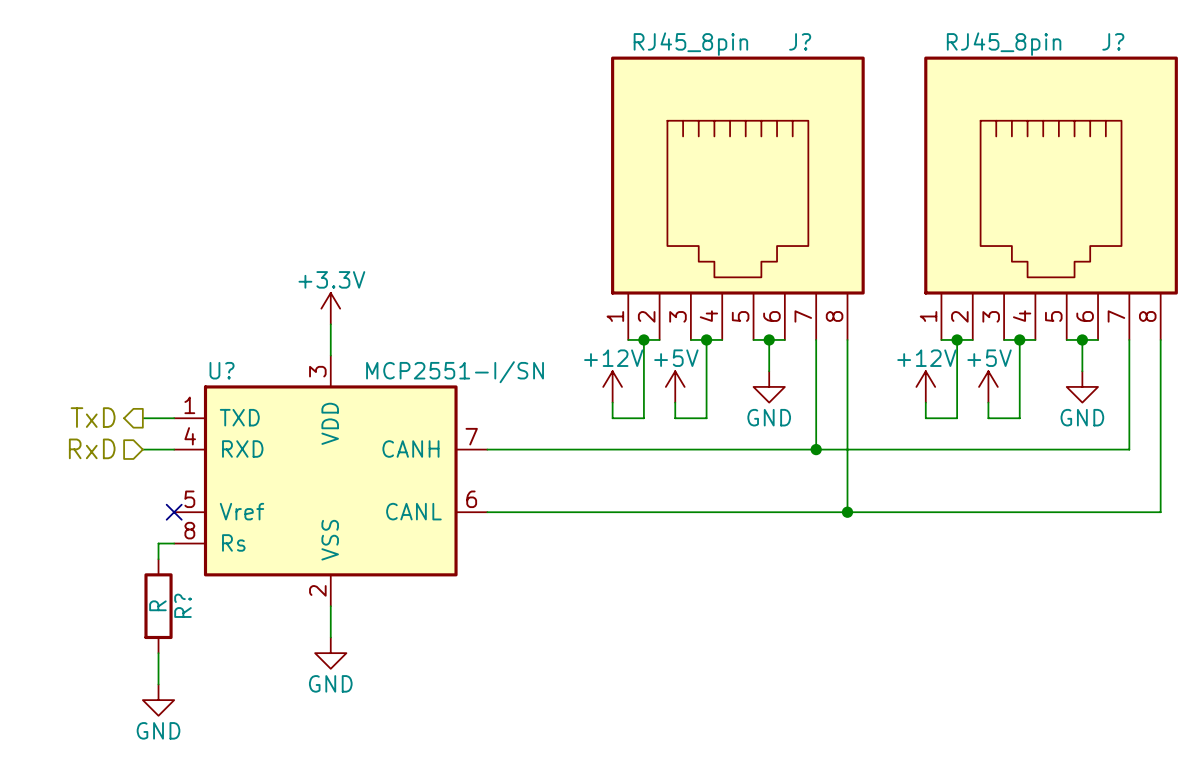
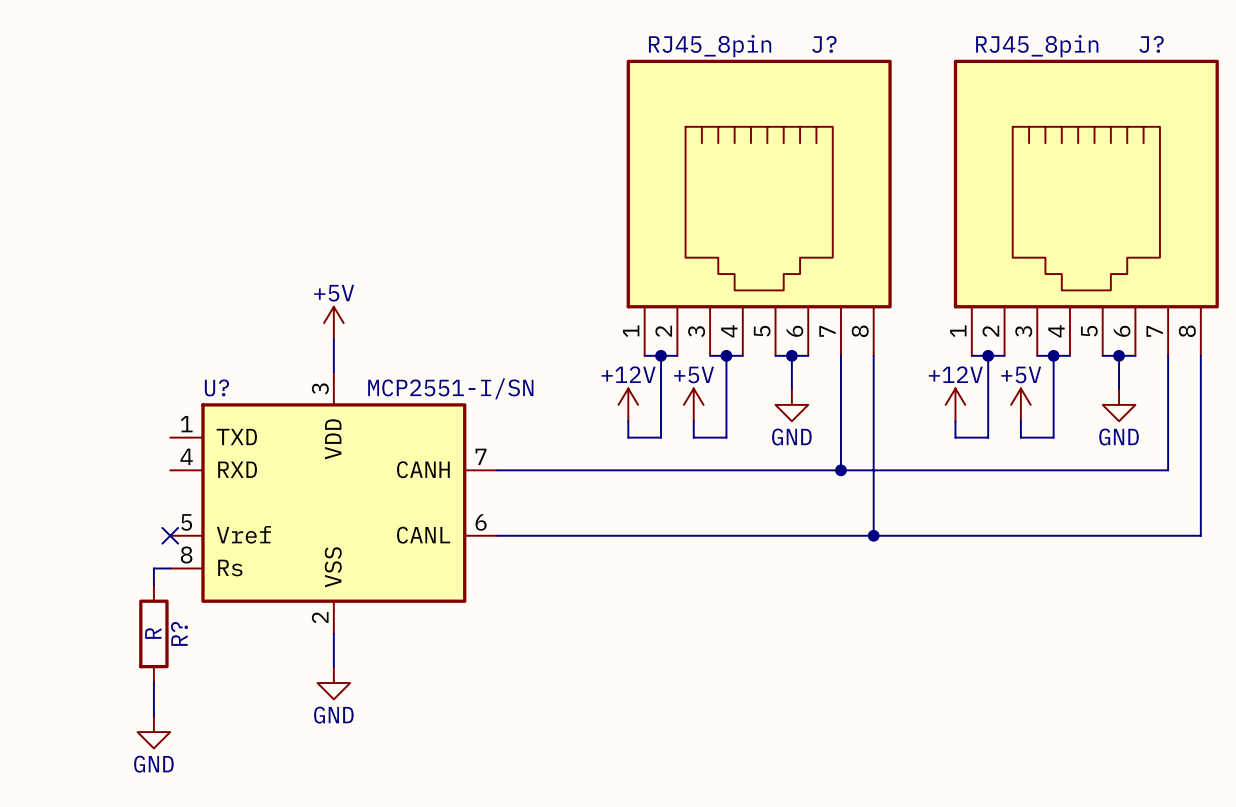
power symbol: +3.3V (330, 308) -> +5V (333, 323)
hierarchical label: TxD (93, 417) -> none
wire: (142, 418) (174, 418) -> none
hierarchical label: RxD (92, 448) -> none
wire: (142, 449) (174, 449) -> none

